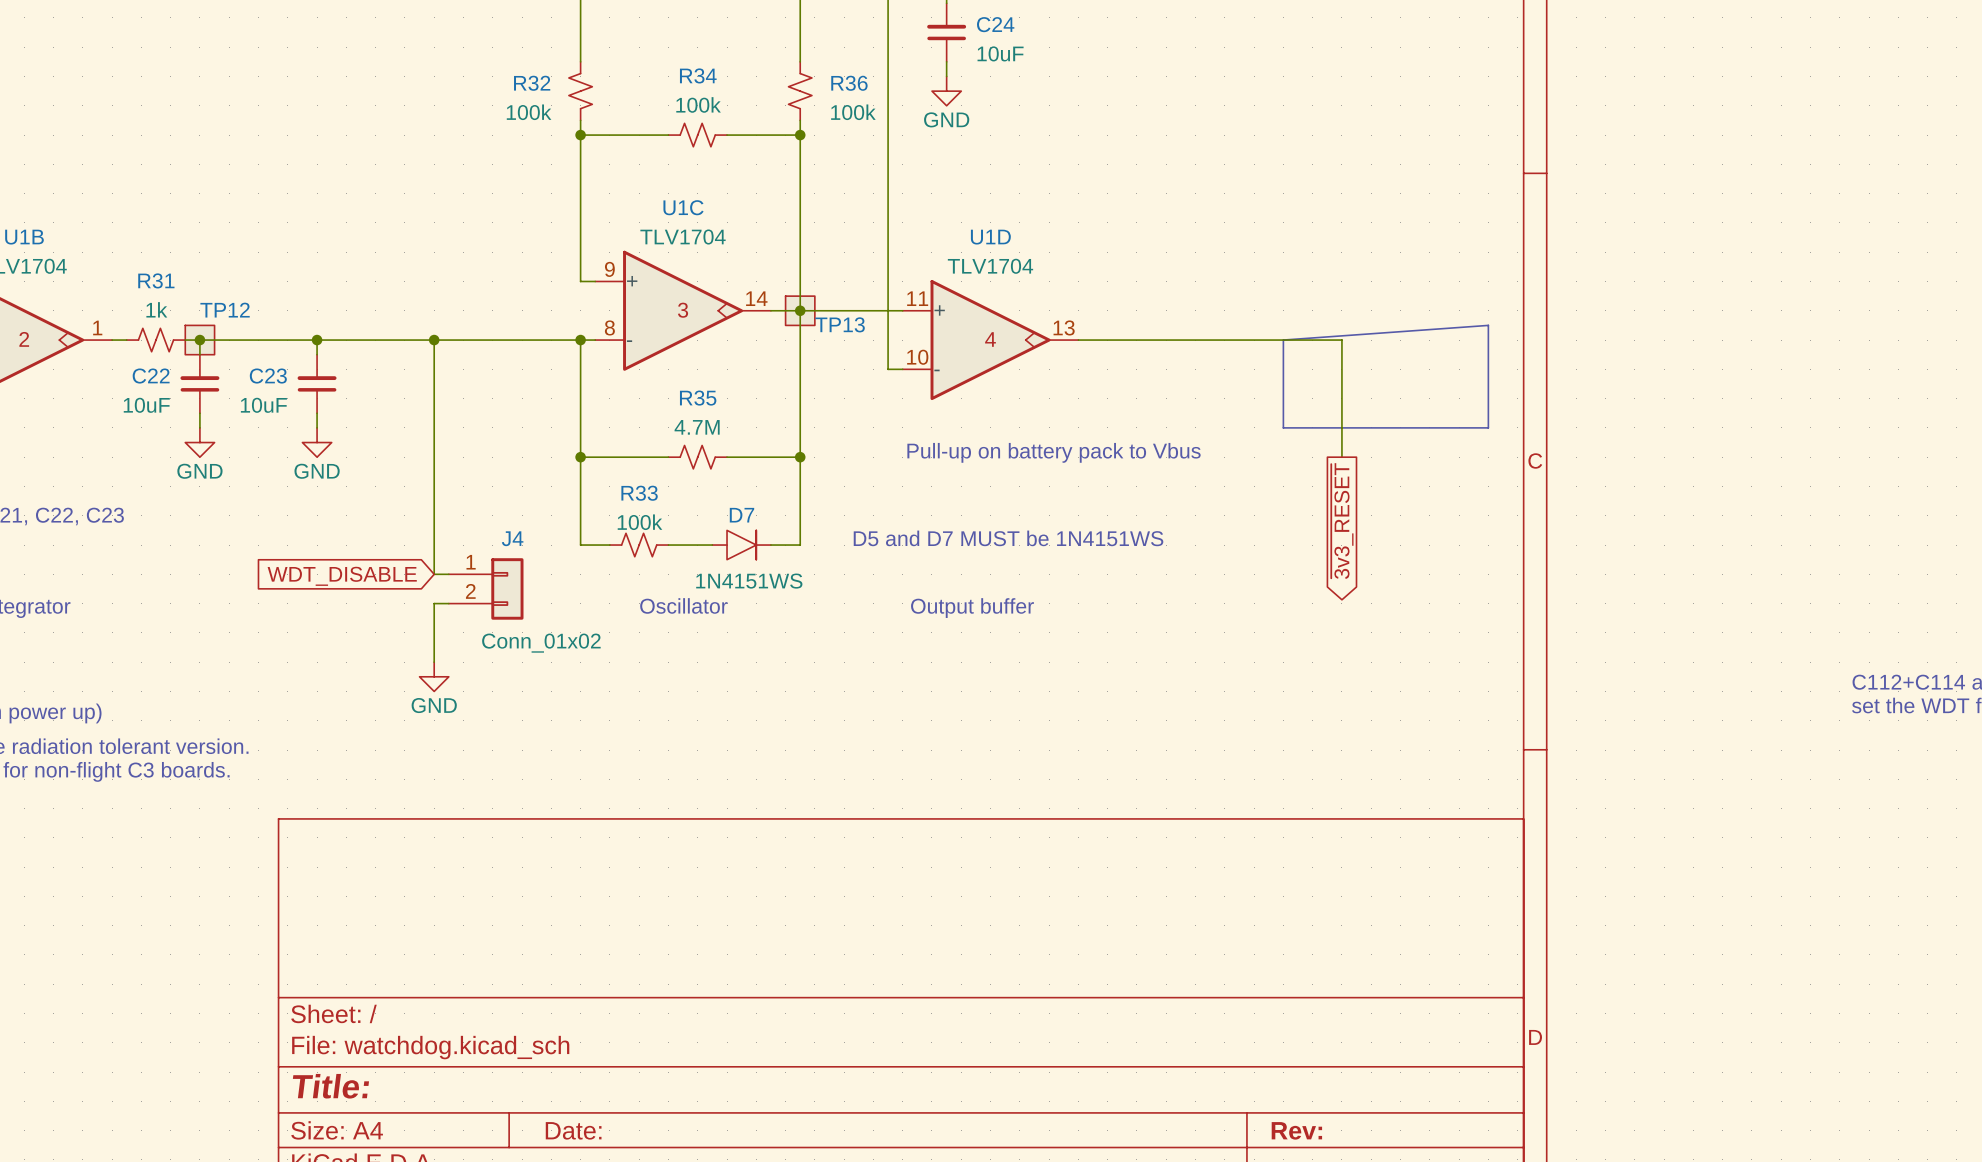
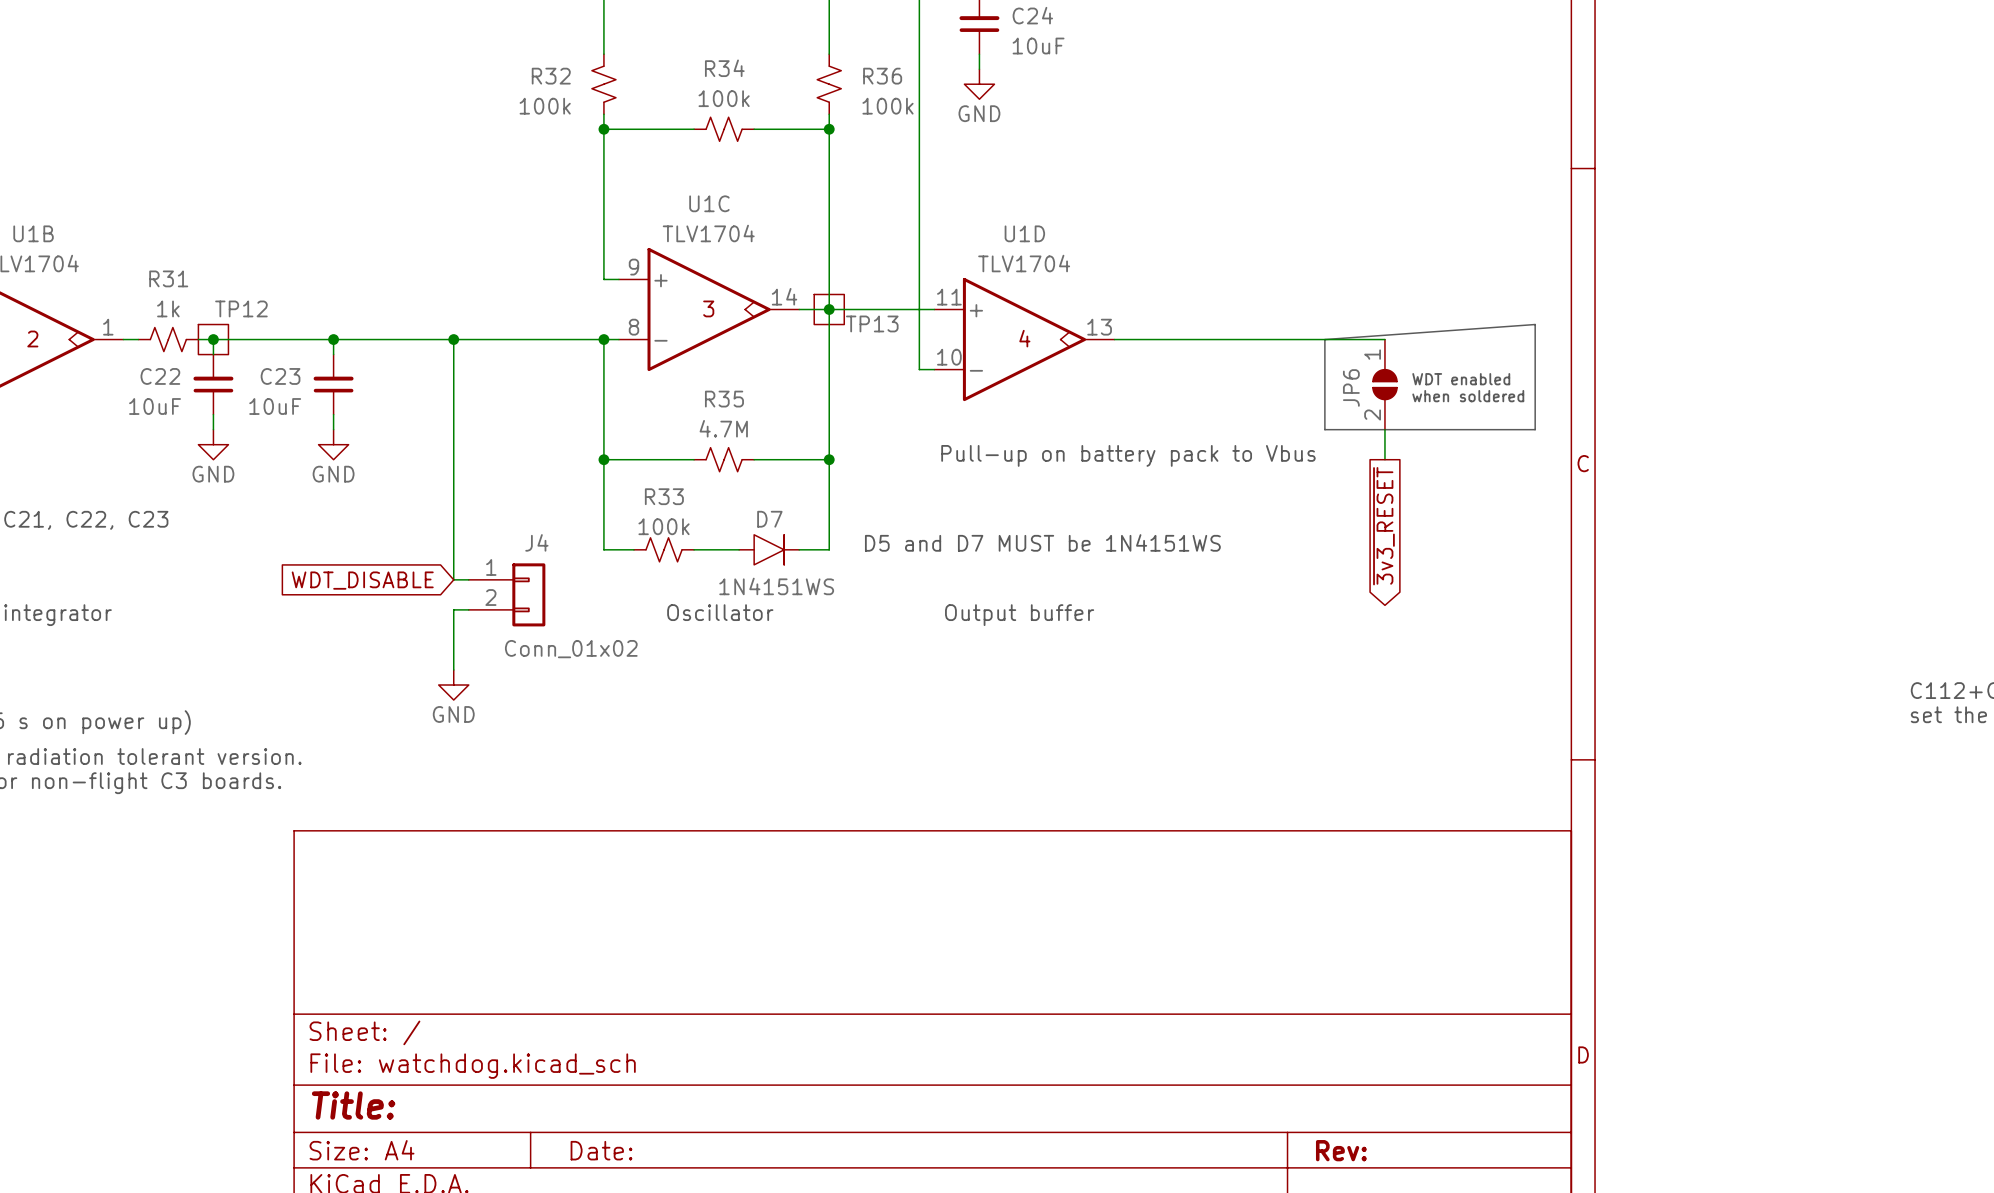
text: none -> WDT enabled (1461, 379)
JP6: none -> (1384, 384)
text: none -> when soldered (1468, 396)

